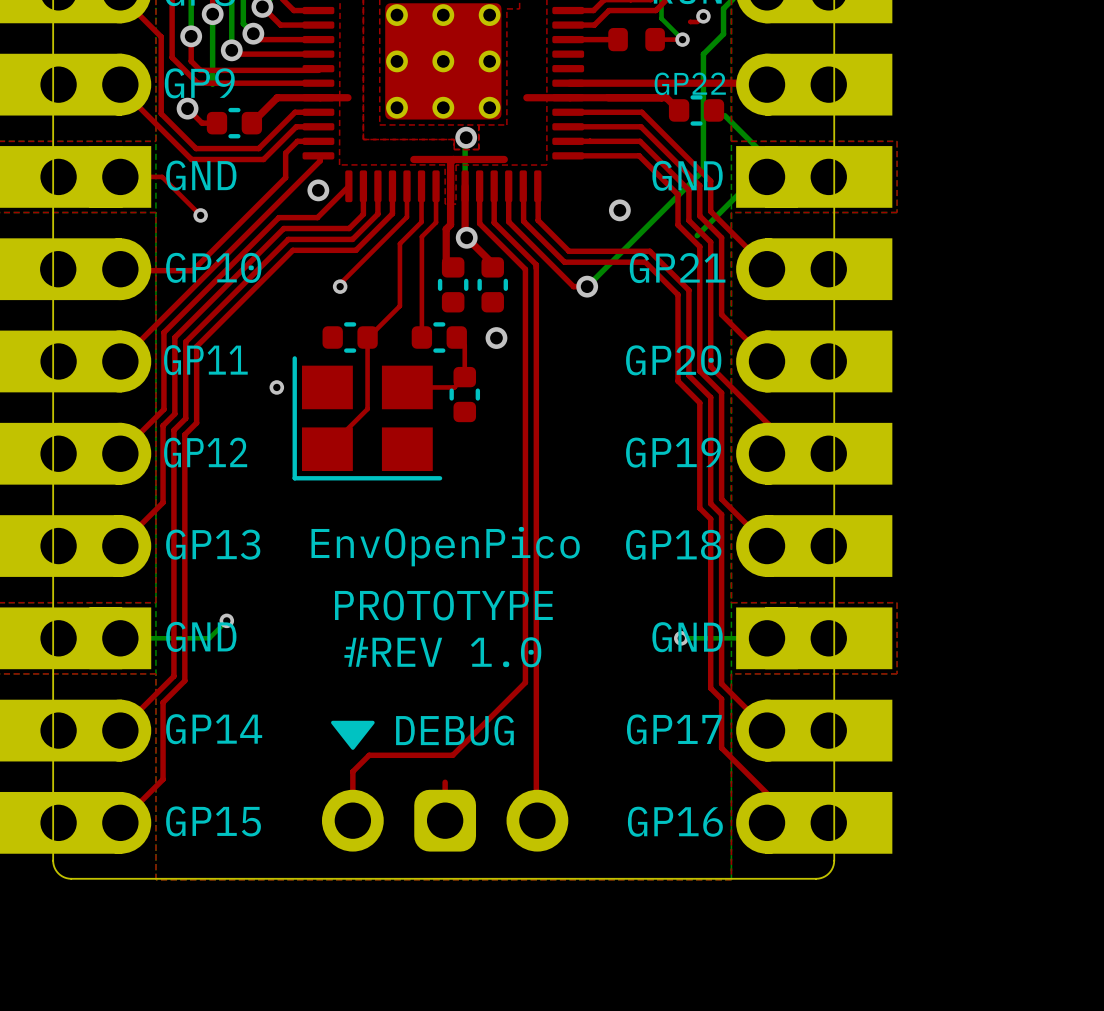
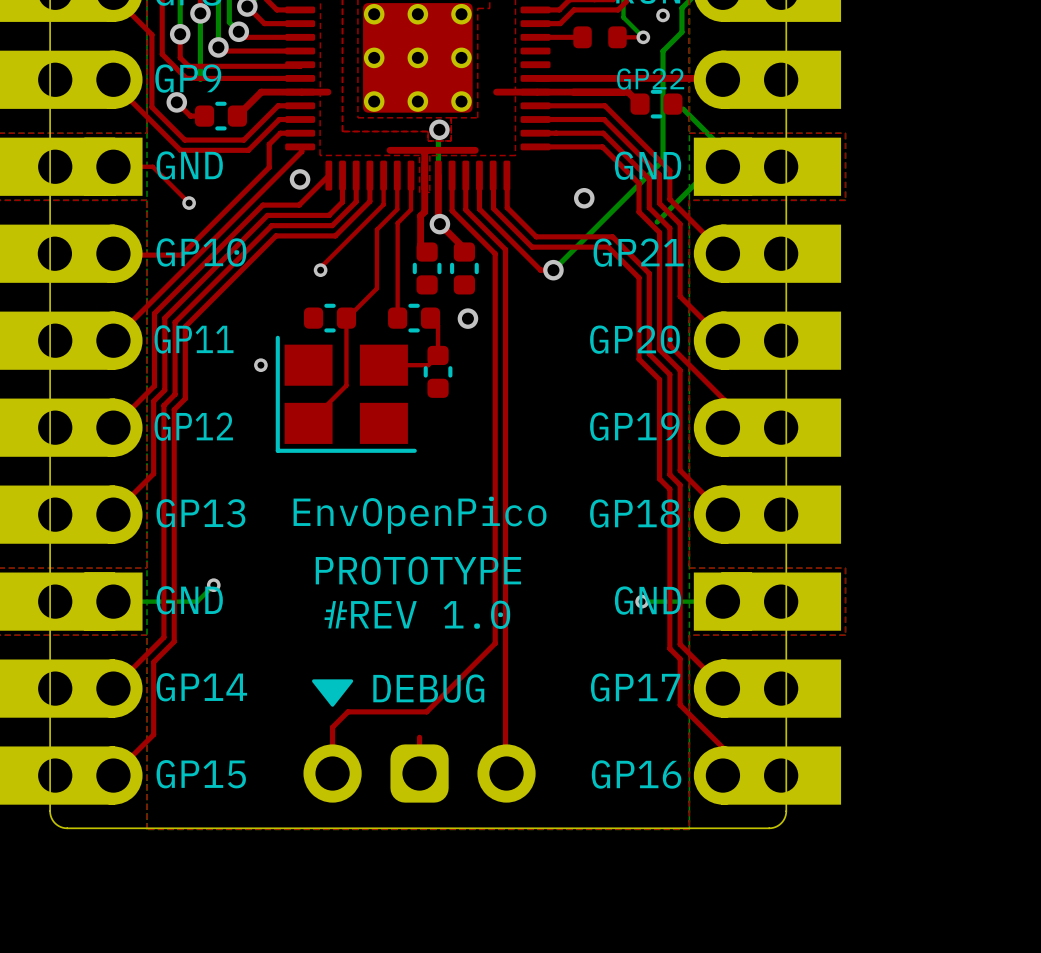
top track: (690, 21) (697, 21) -> none

